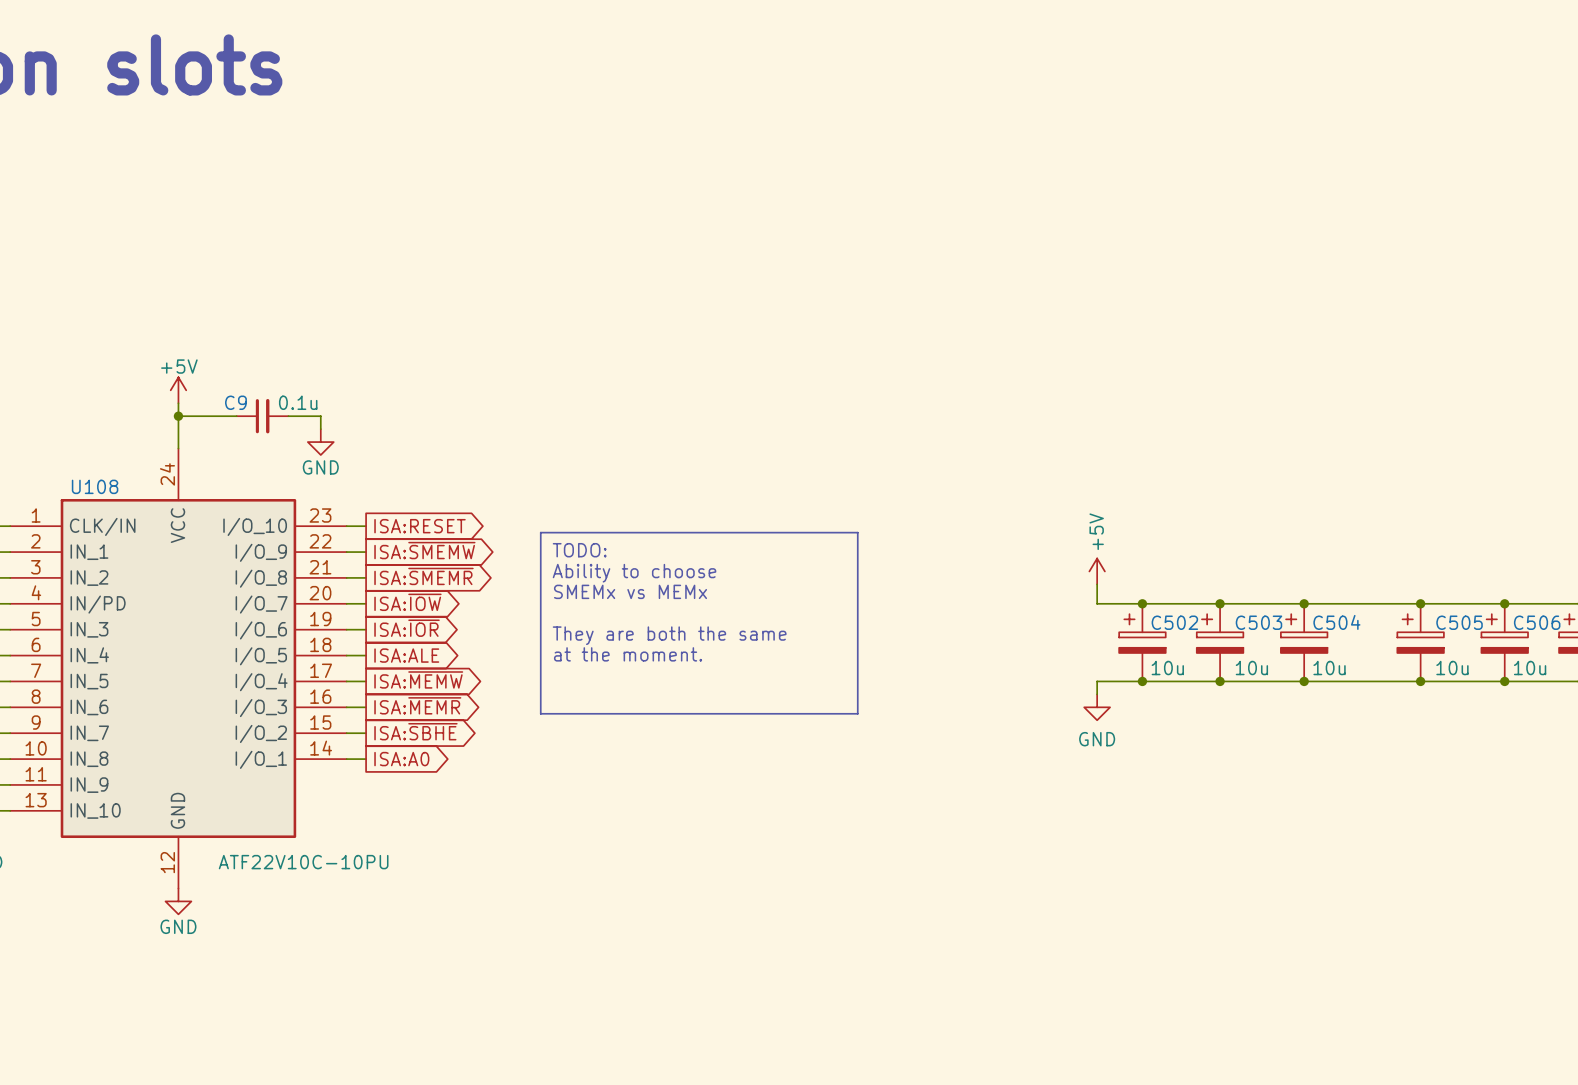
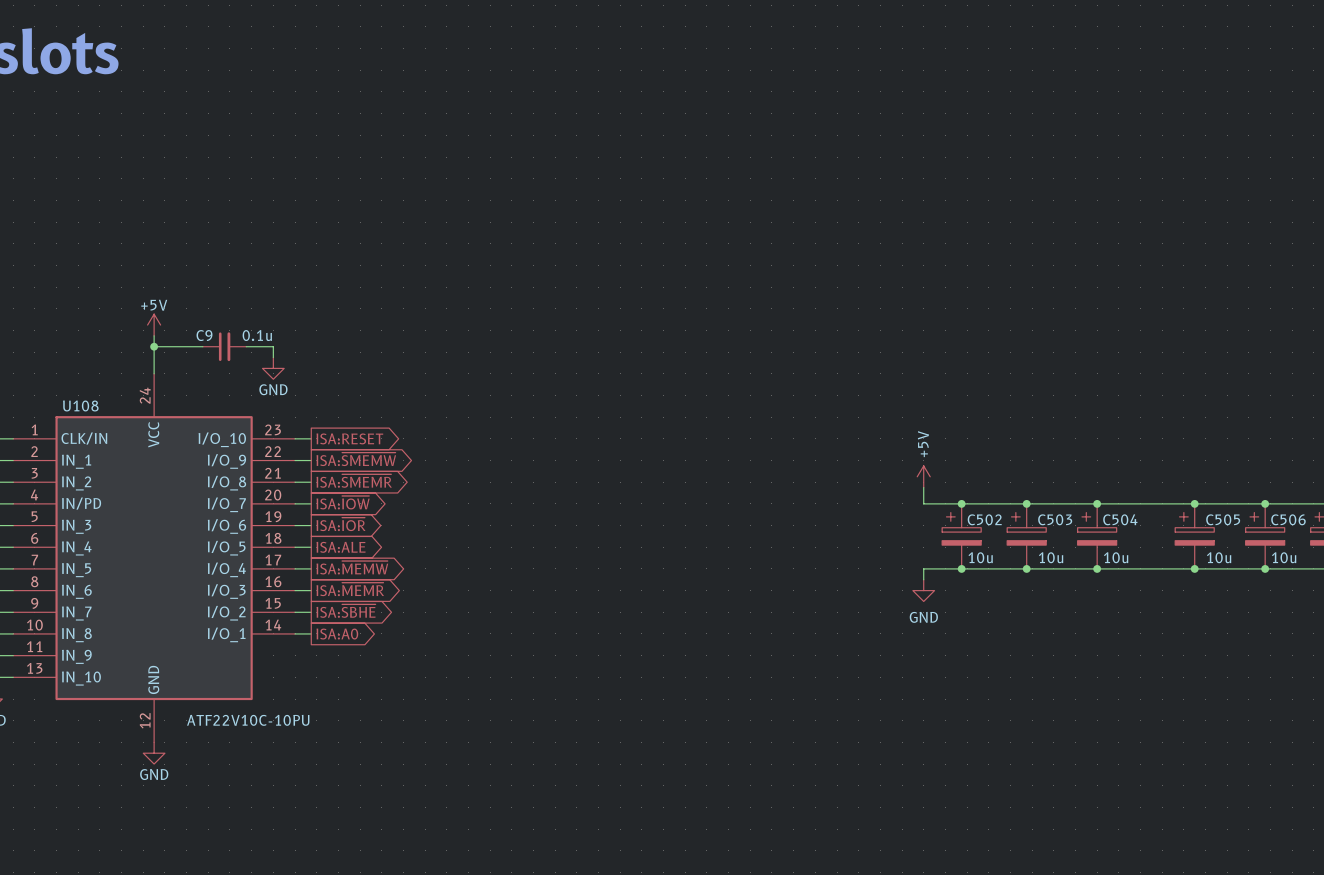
line: (540, 532) (857, 532) (857, 713) (540, 713) (540, 532) -> none
text: TODO: (579, 550) -> none
text: Ability to choose (634, 573) -> none
text: SMEMx vs MEMx (630, 591) -> none
text: They are both the same (669, 635) -> none
text: at the moment. (628, 654) -> none

